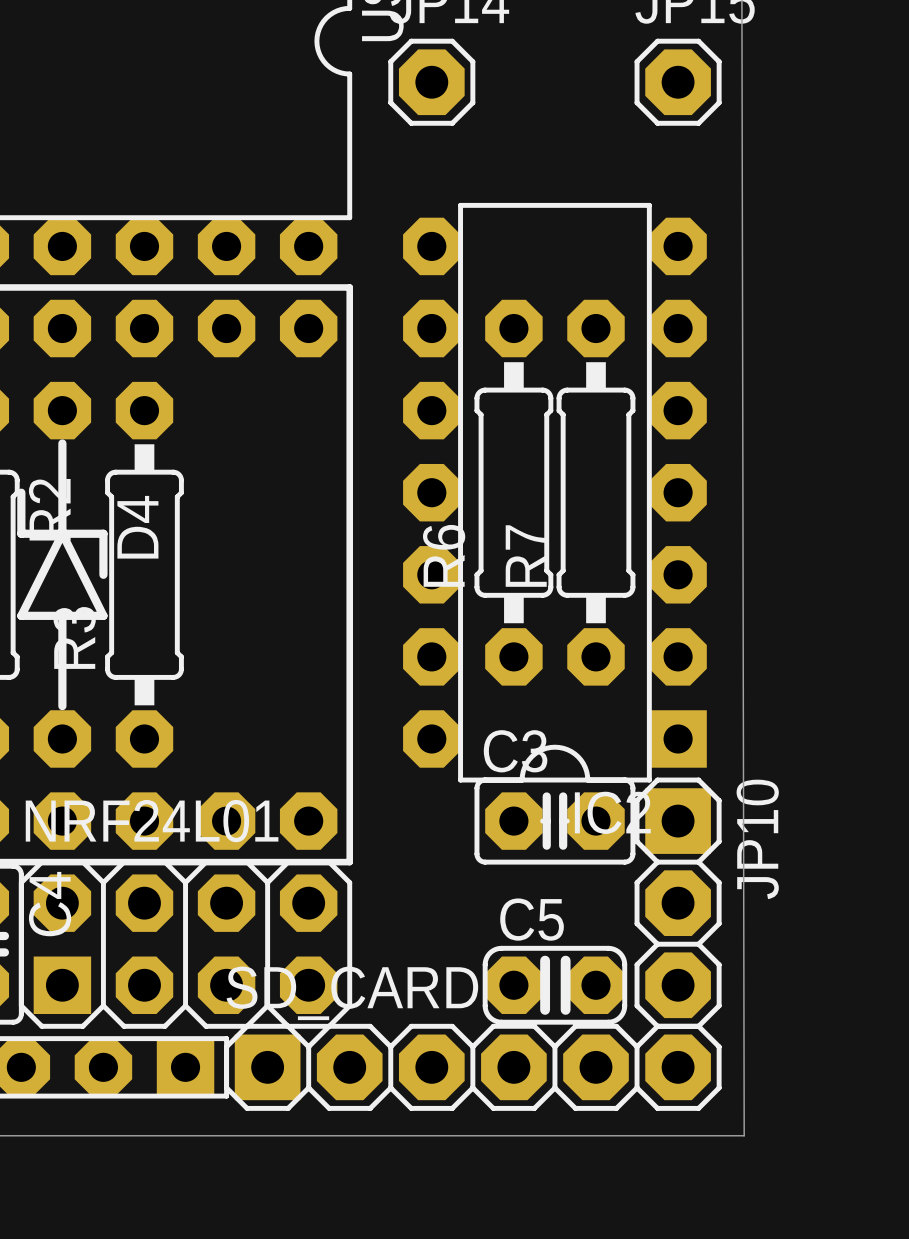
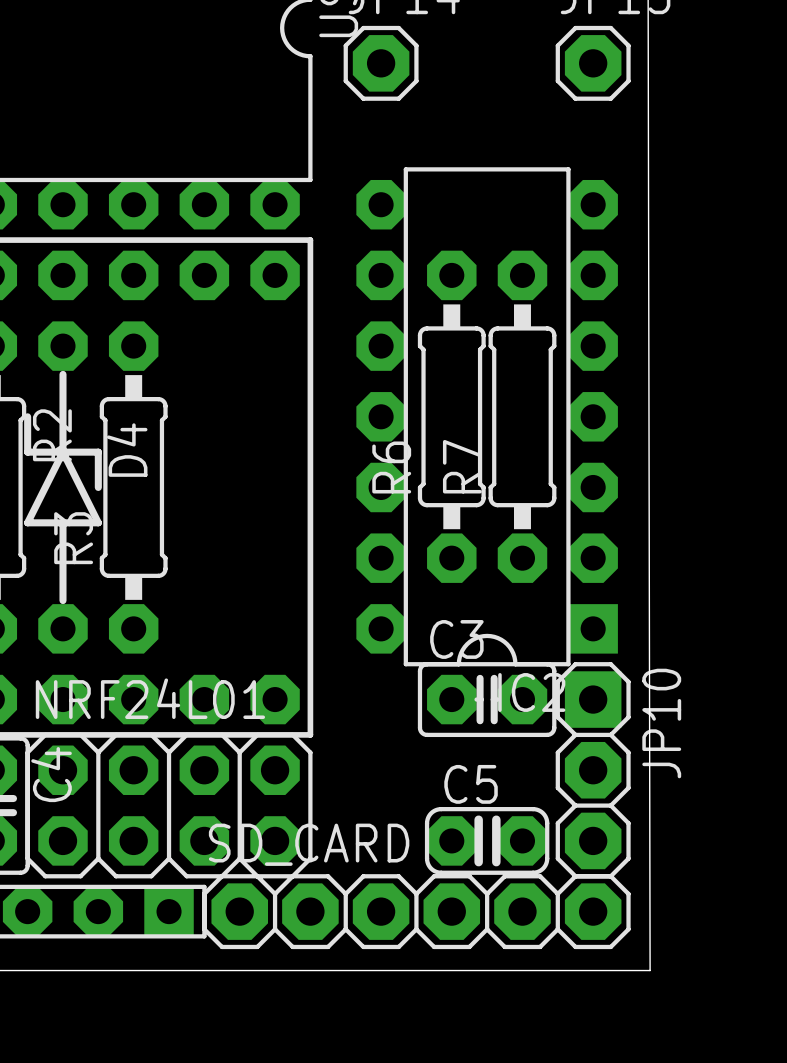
NRF24L01 footprint: [18, 859, 353, 1029] -> [25, 732, 313, 879]
SD_CARD footprint: [224, 1023, 722, 1111] -> [202, 874, 631, 950]

